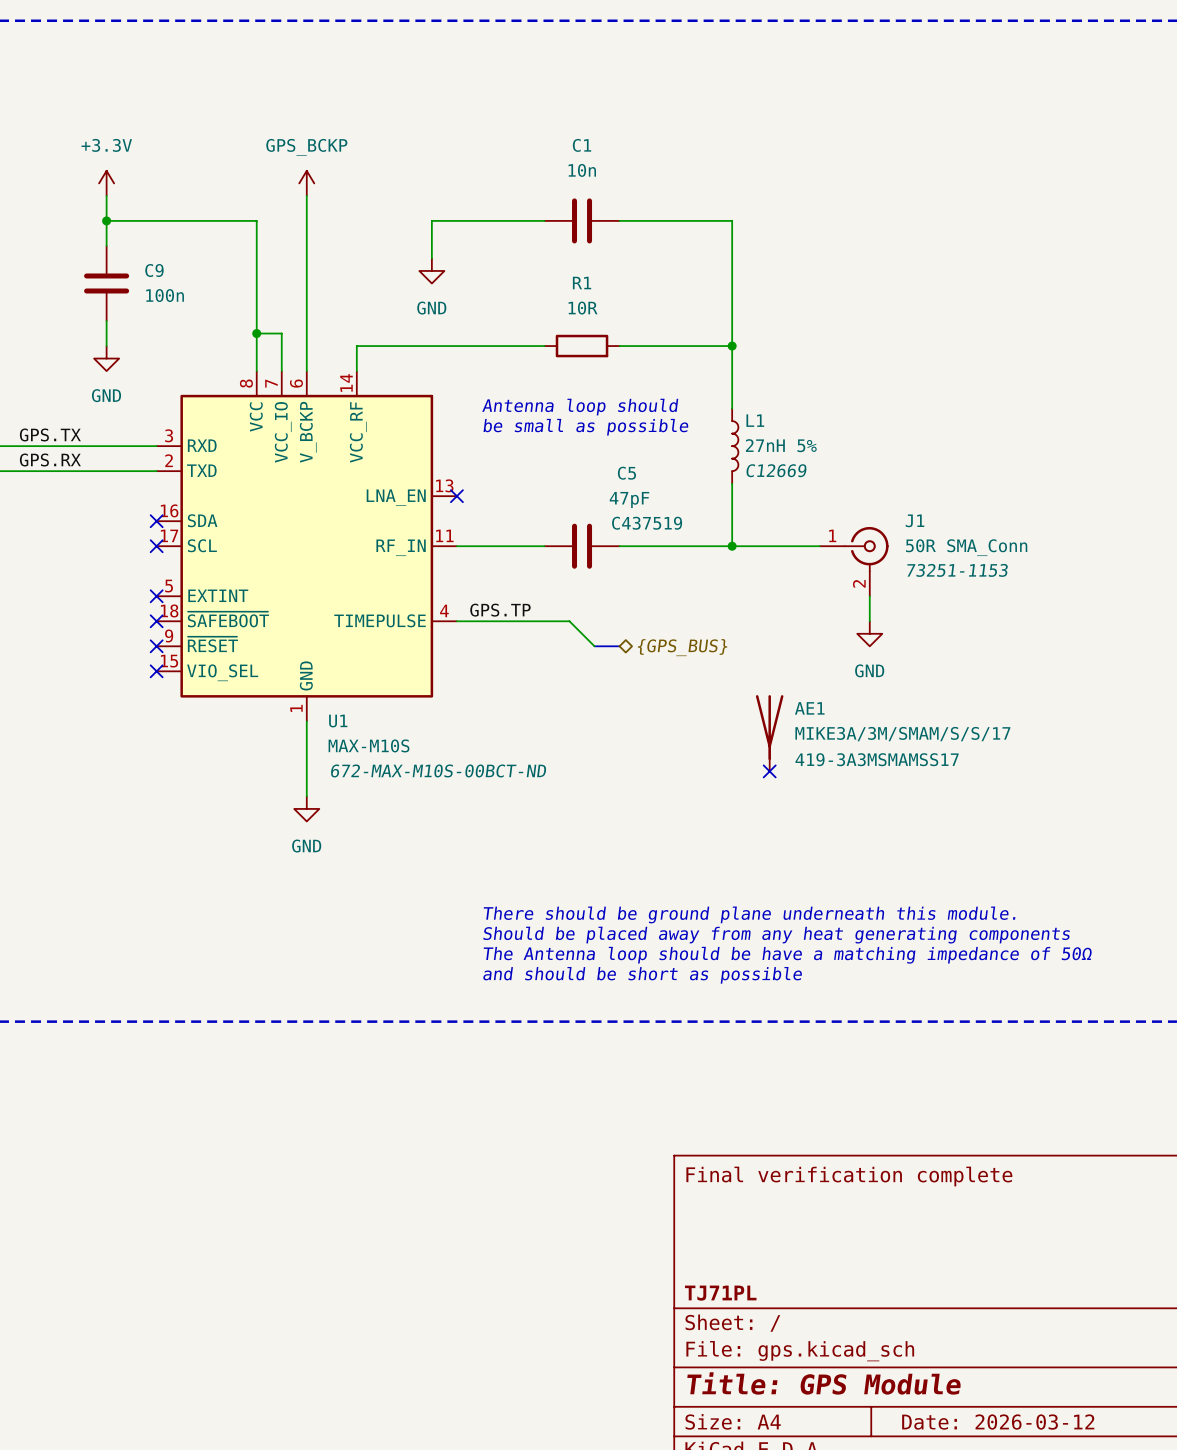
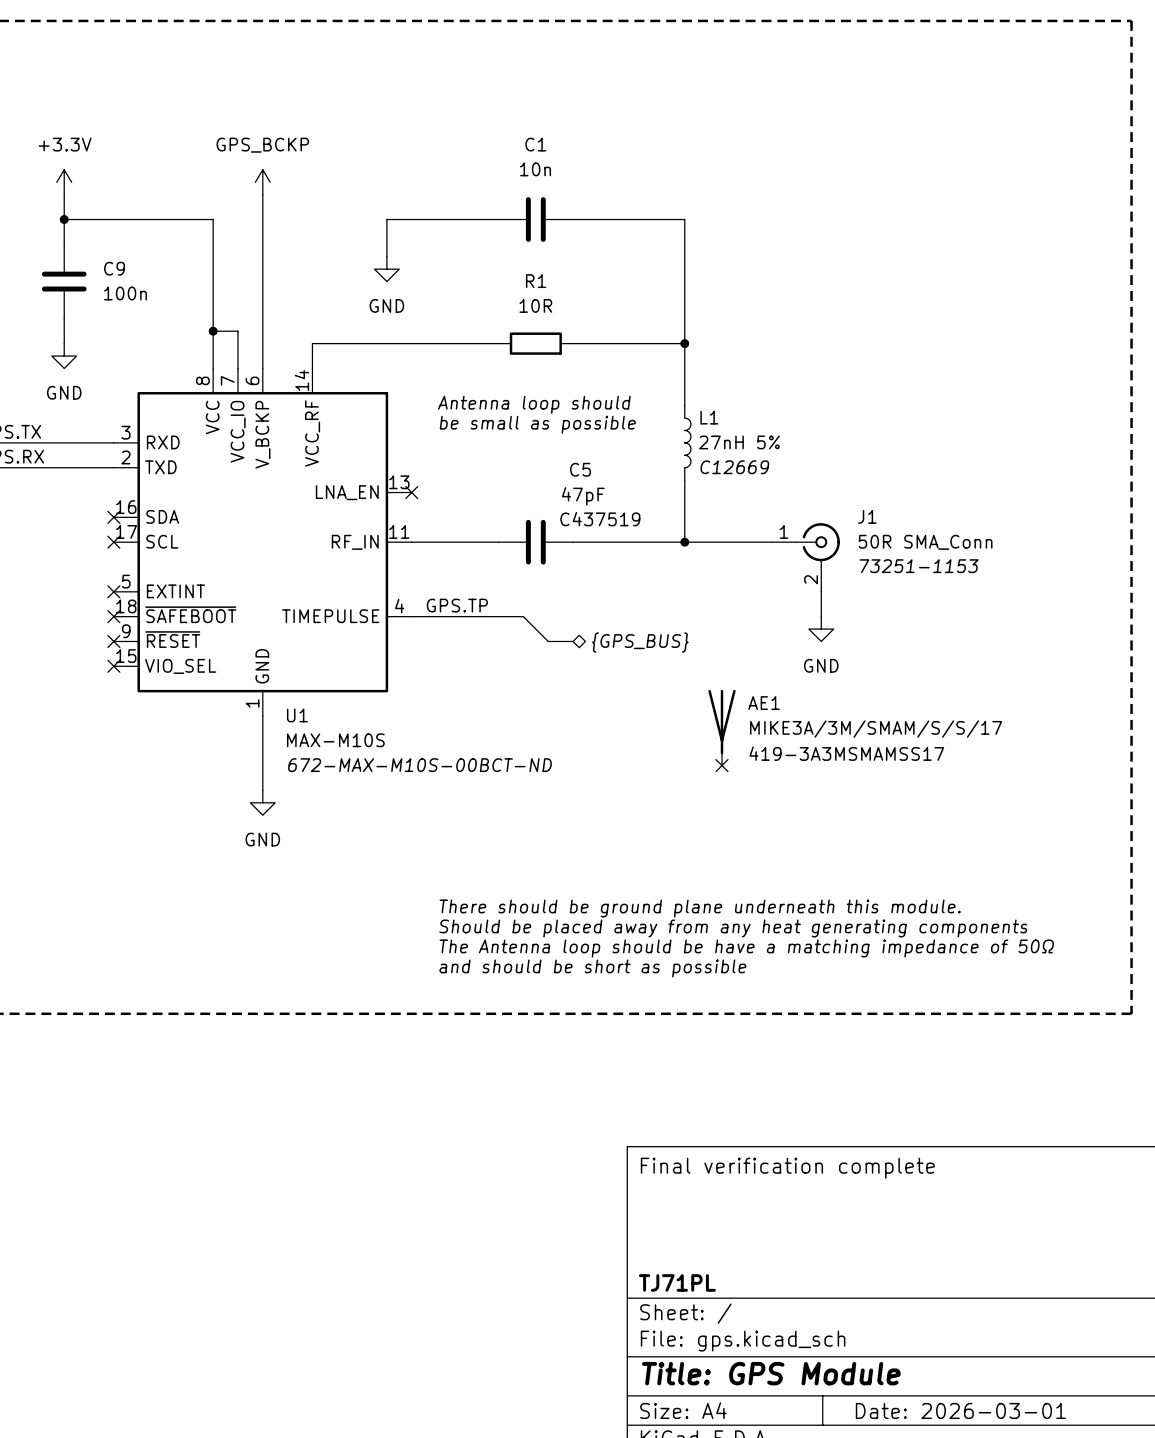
title block: Date: 2026-03-12 (998, 1422) -> Date: 2026-03-01 (960, 1410)

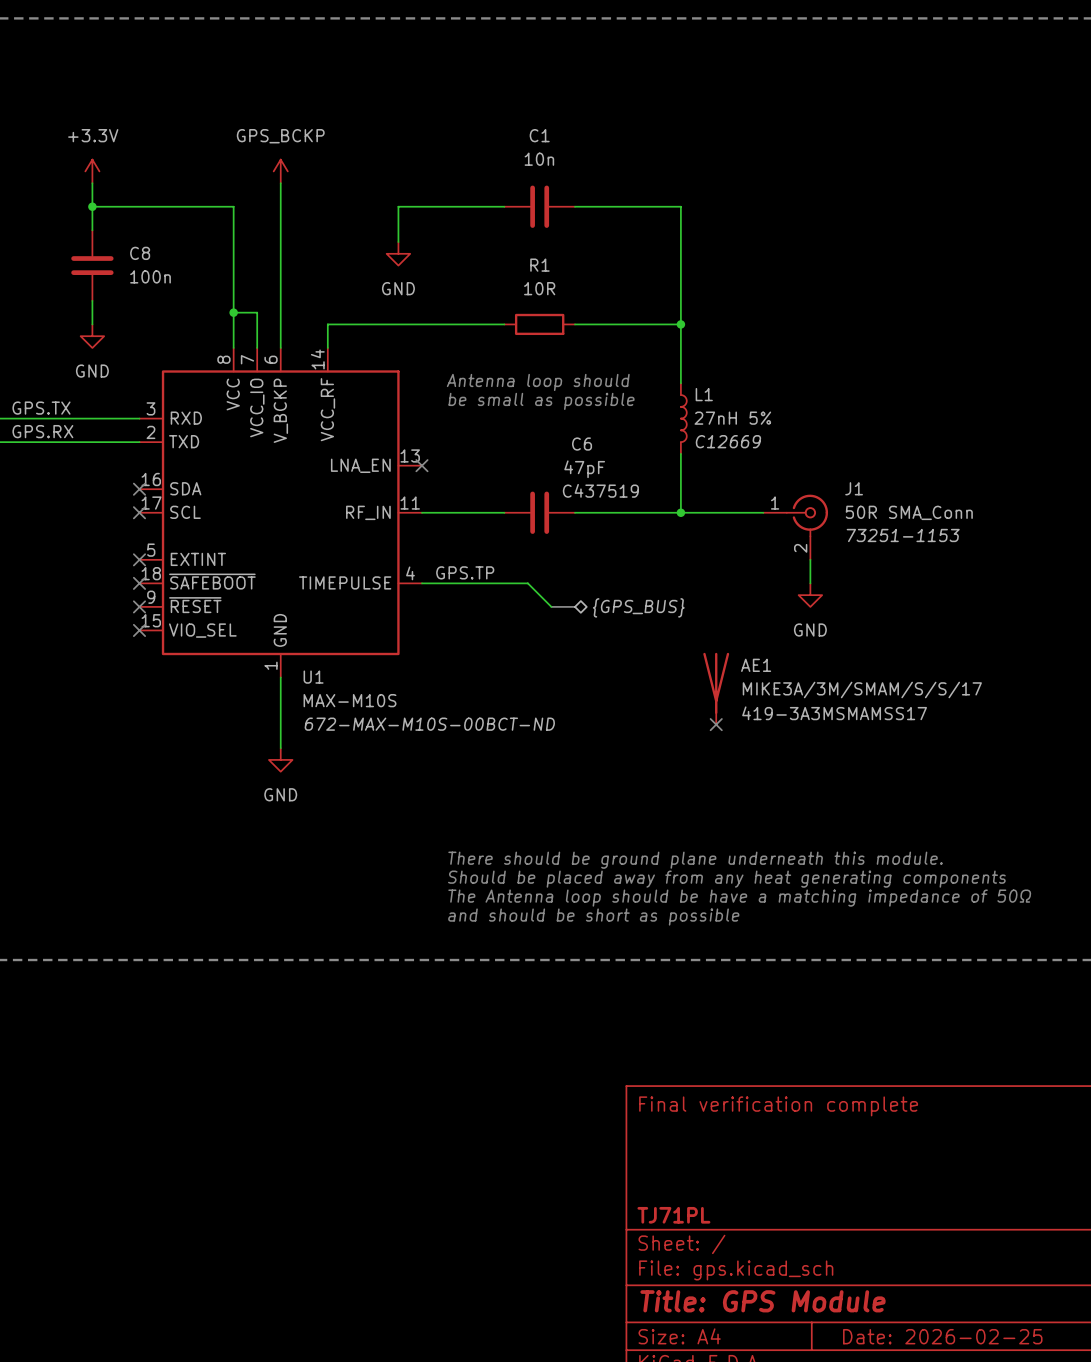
C9 name: C9 (114, 268) -> C8 (140, 253)
C5 name: C5 (580, 469) -> C6 (582, 444)
title block: Date: 2026-03-01 (960, 1410) -> Date: 2026-02-25 (942, 1336)

